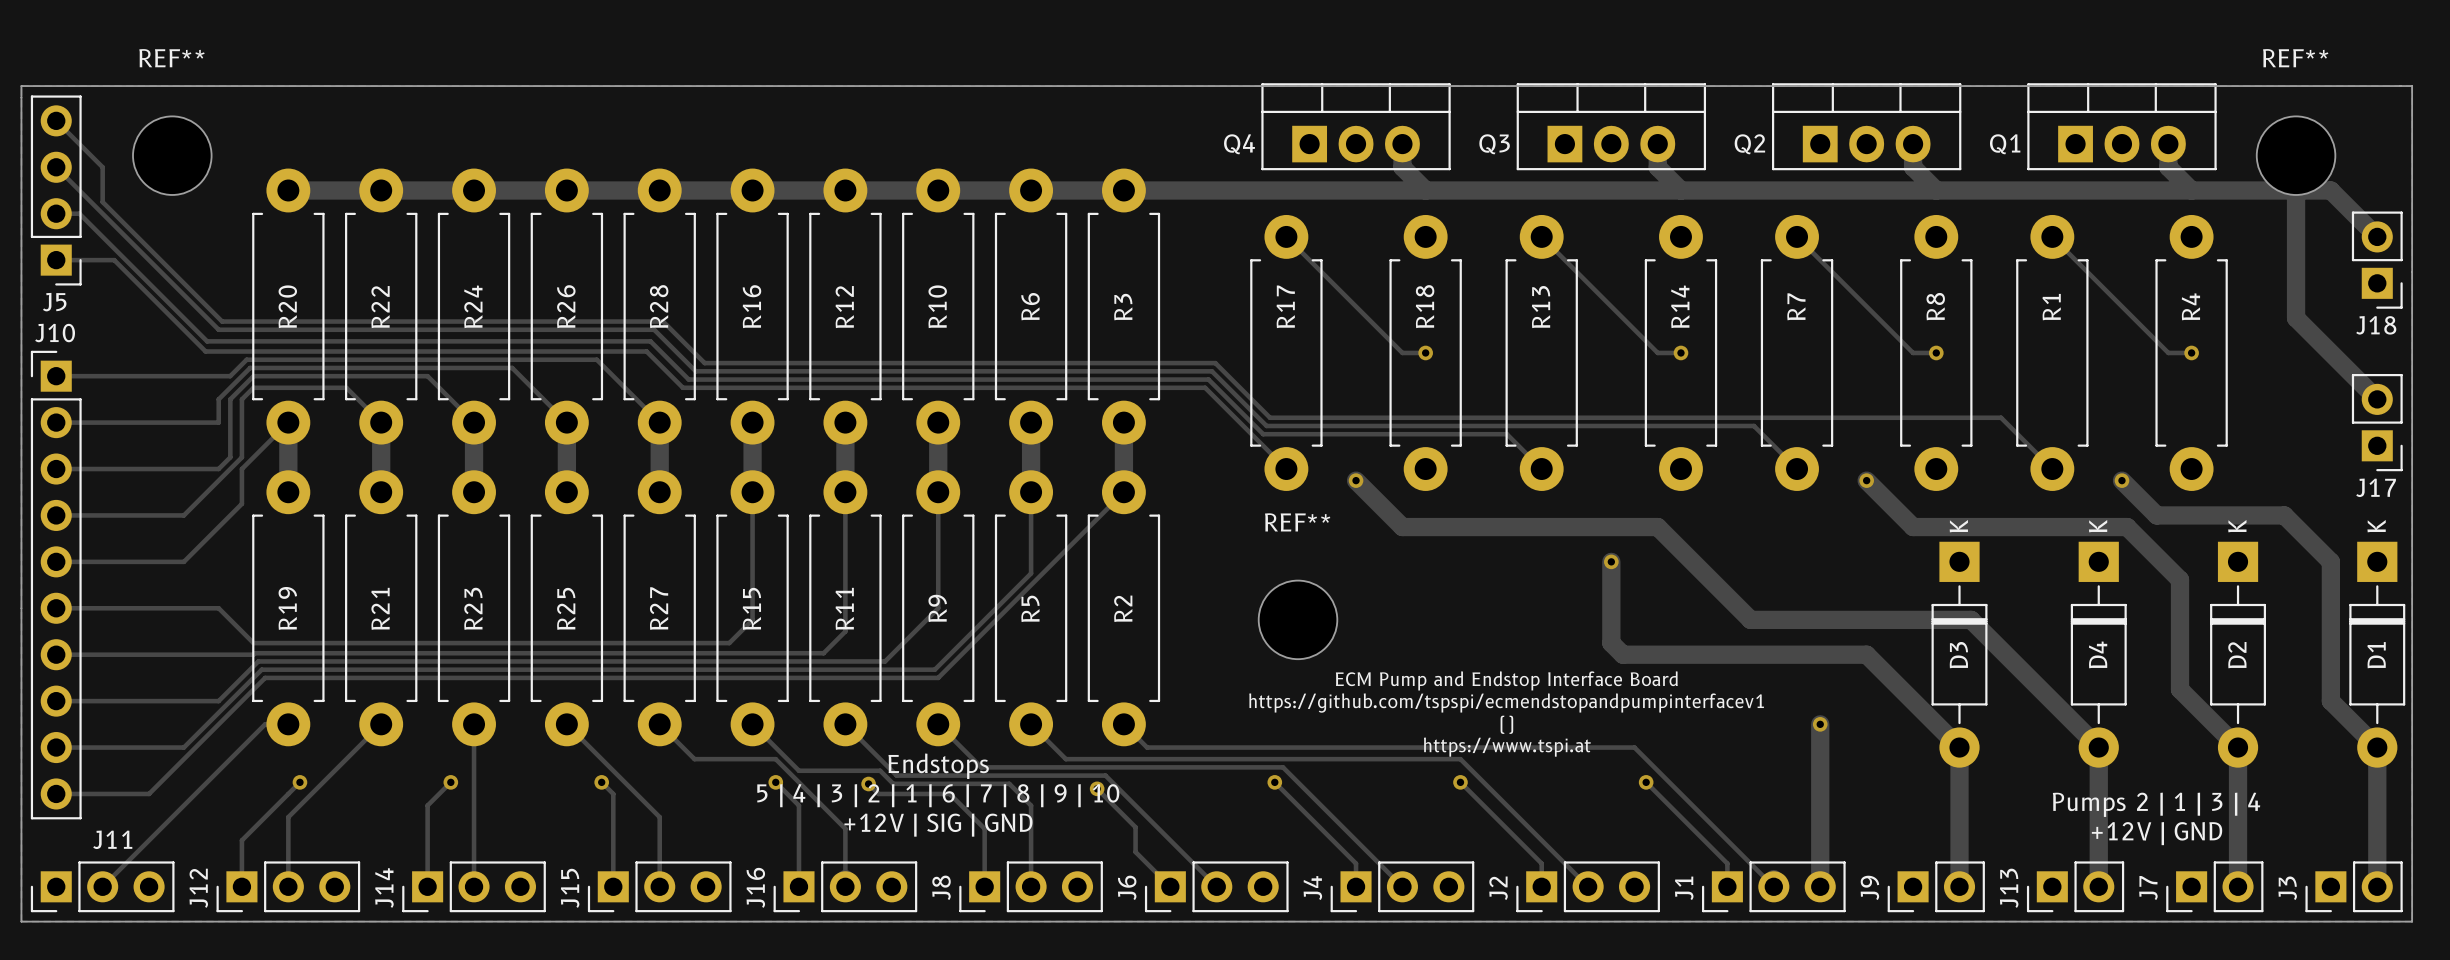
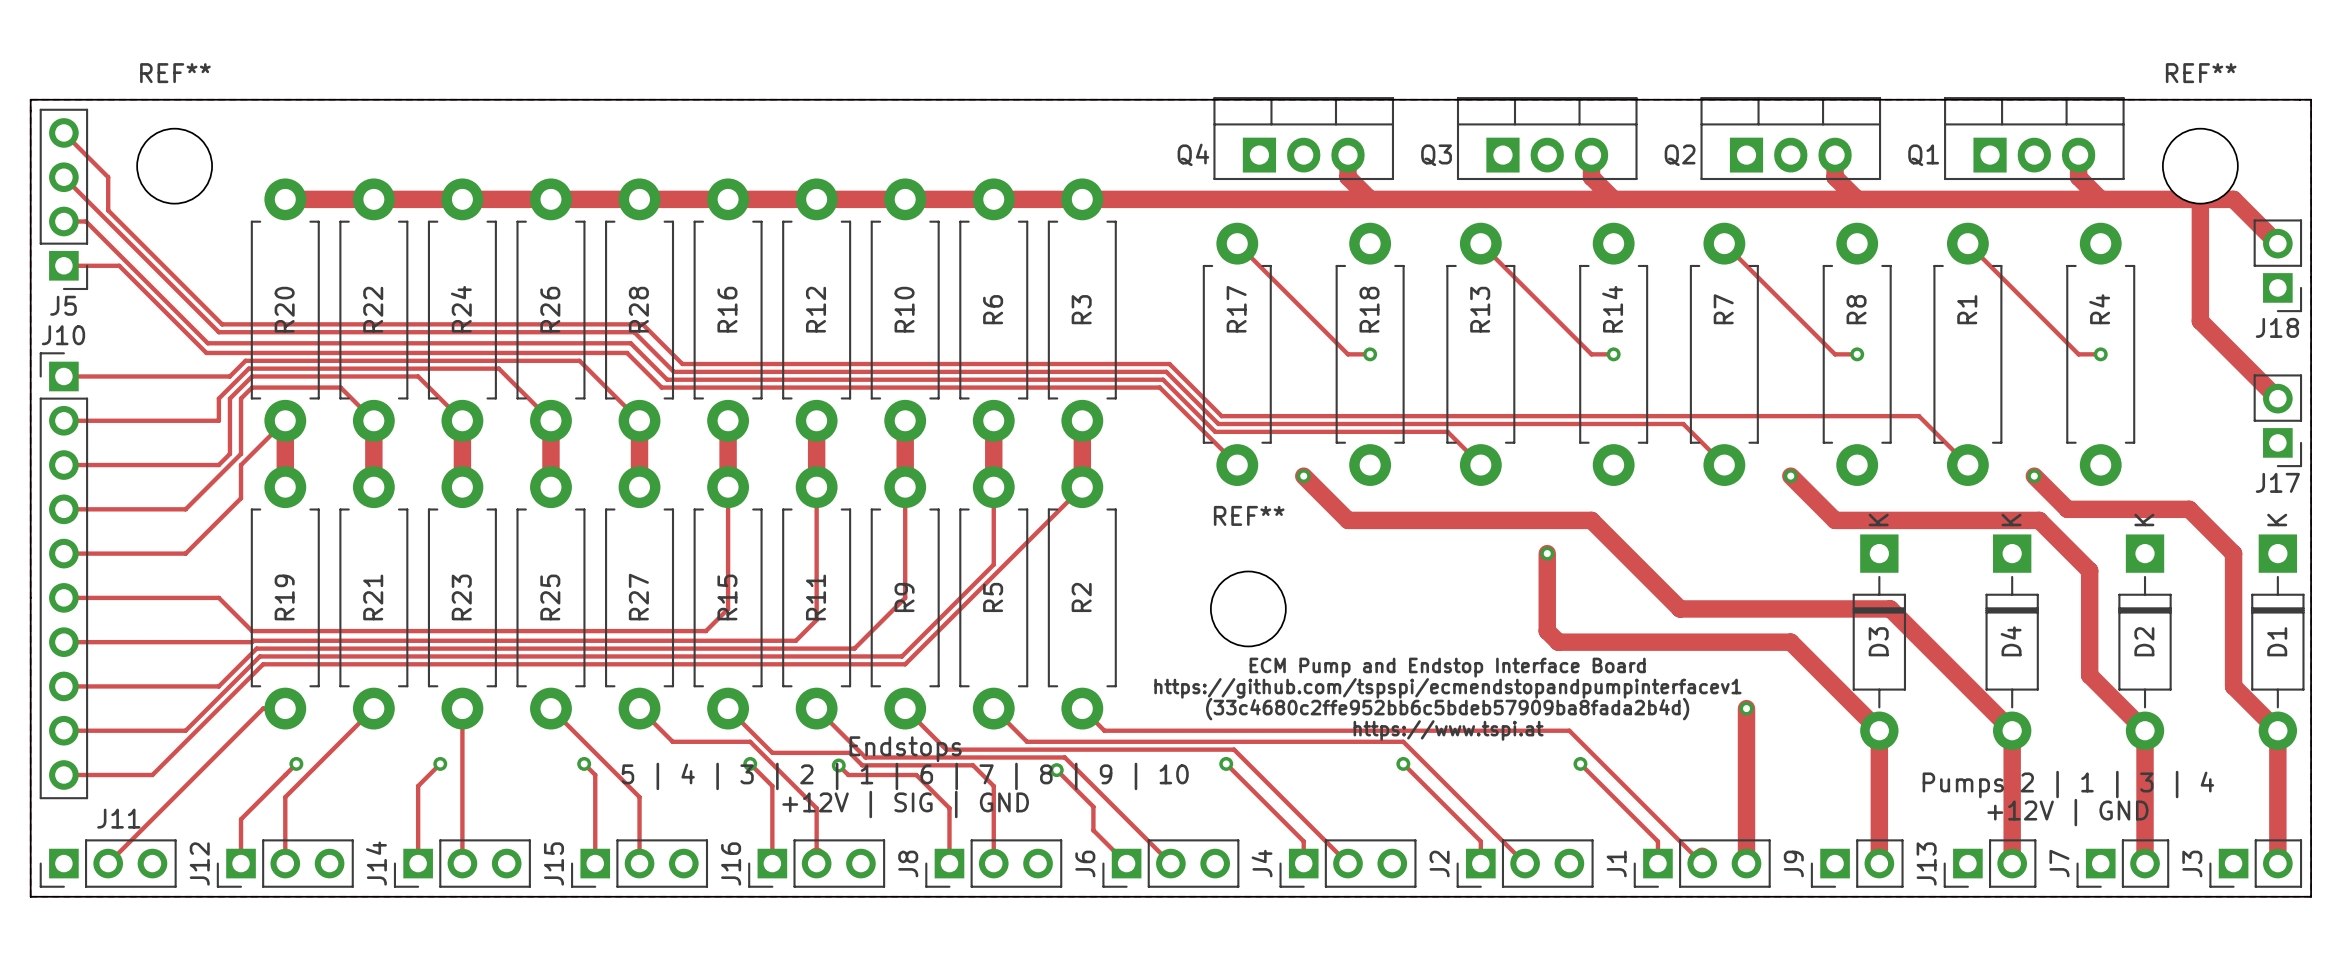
text: () (1506, 724) -> (33c4680c2ffe952bb6c5bdeb57909ba8fada2b4d) (1447, 709)

